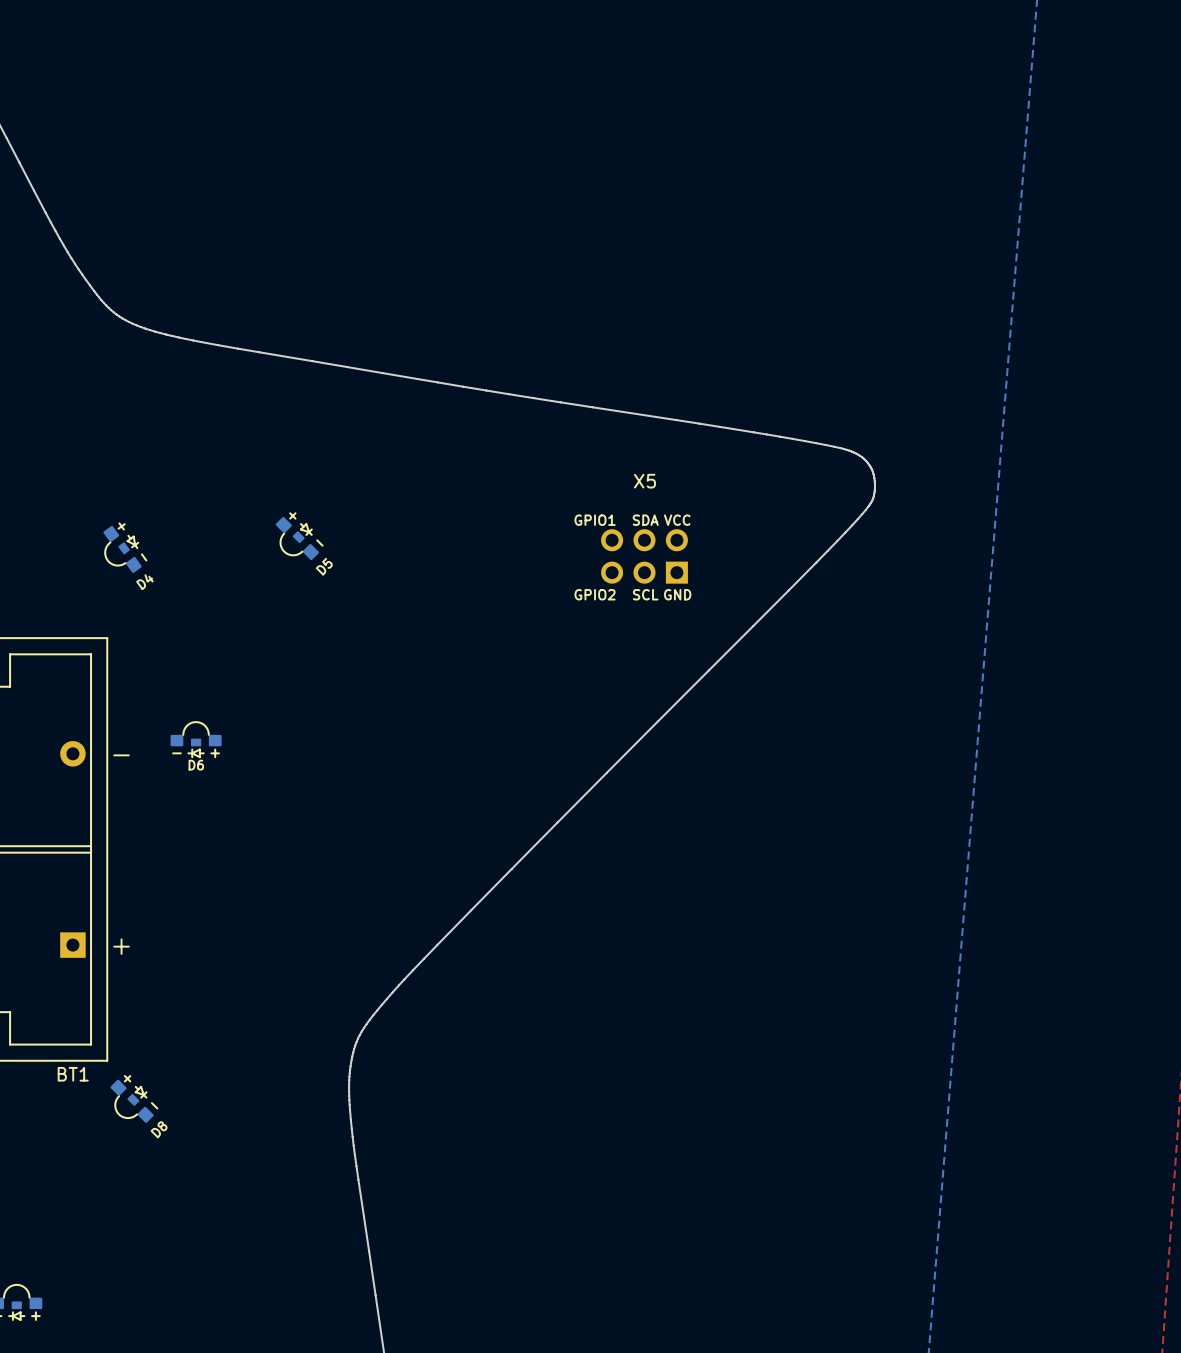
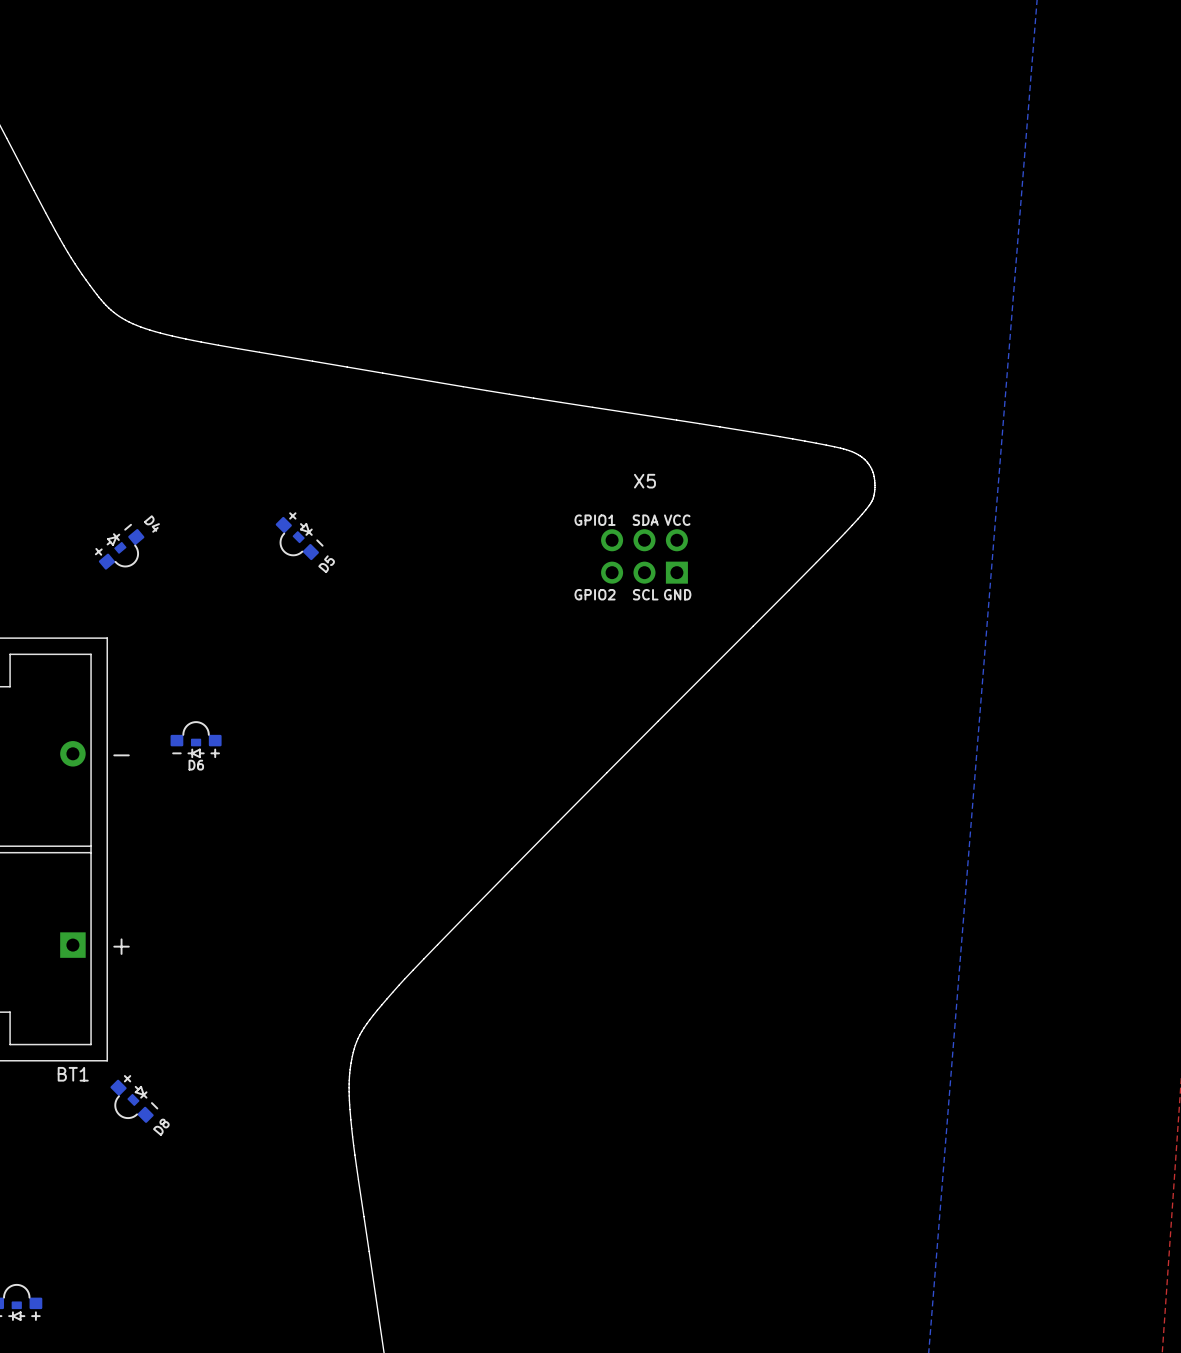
D4 rotation: 0° (125, 547) -> 94° counterclockwise (119, 546)
D5 name rotation: 0° (324, 566) -> 5° counterclockwise (326, 564)
D8 name rotation: 0° (159, 1129) -> 5° counterclockwise (161, 1127)

